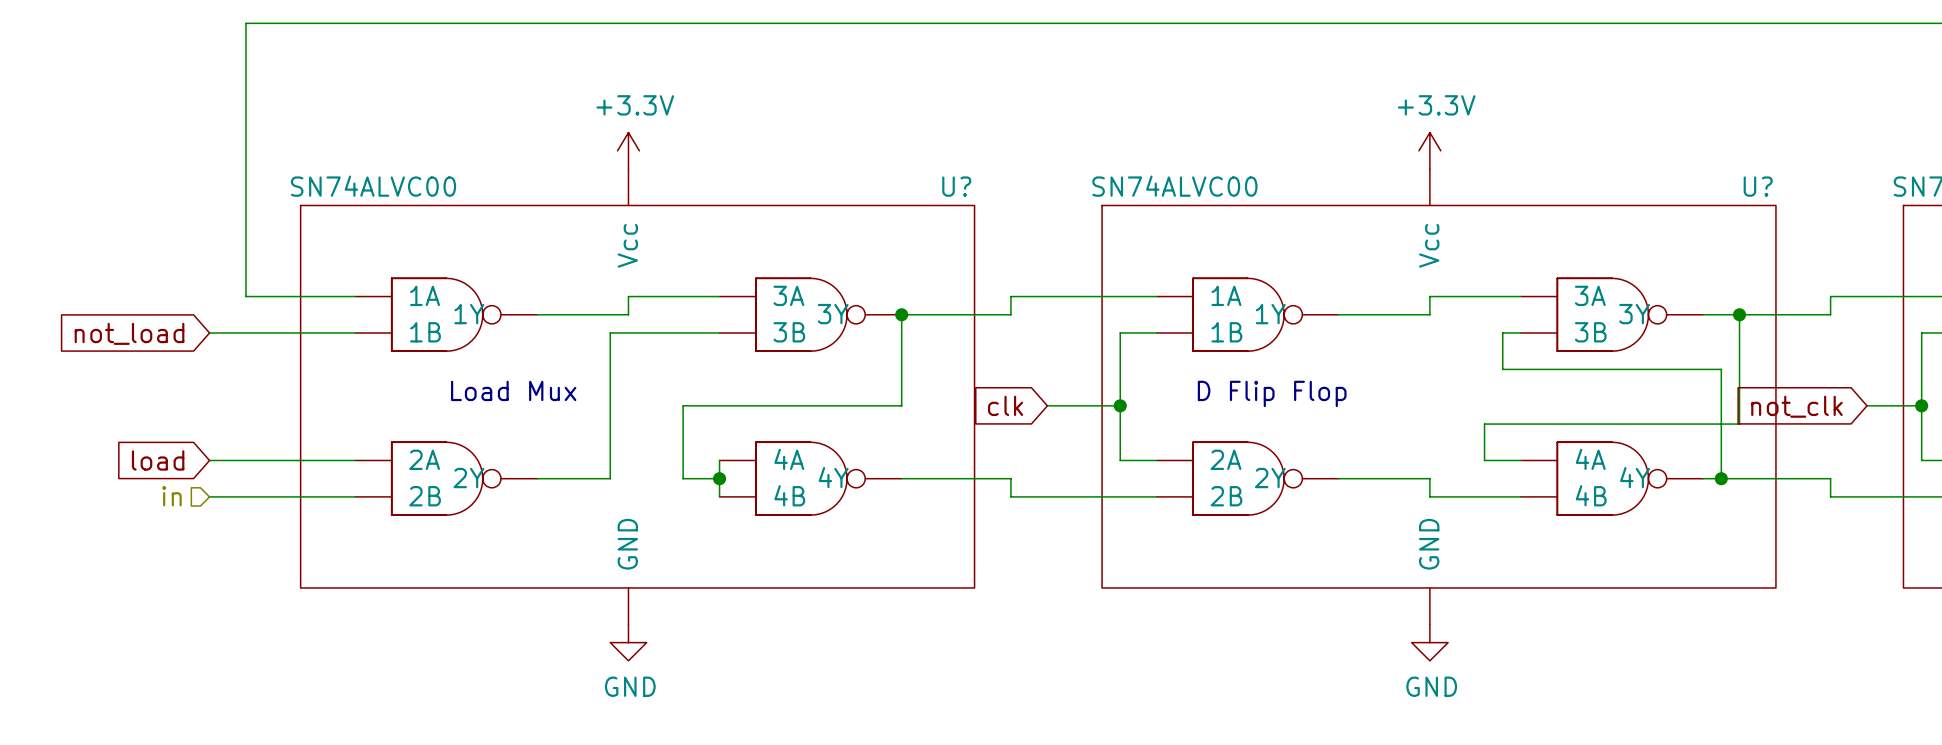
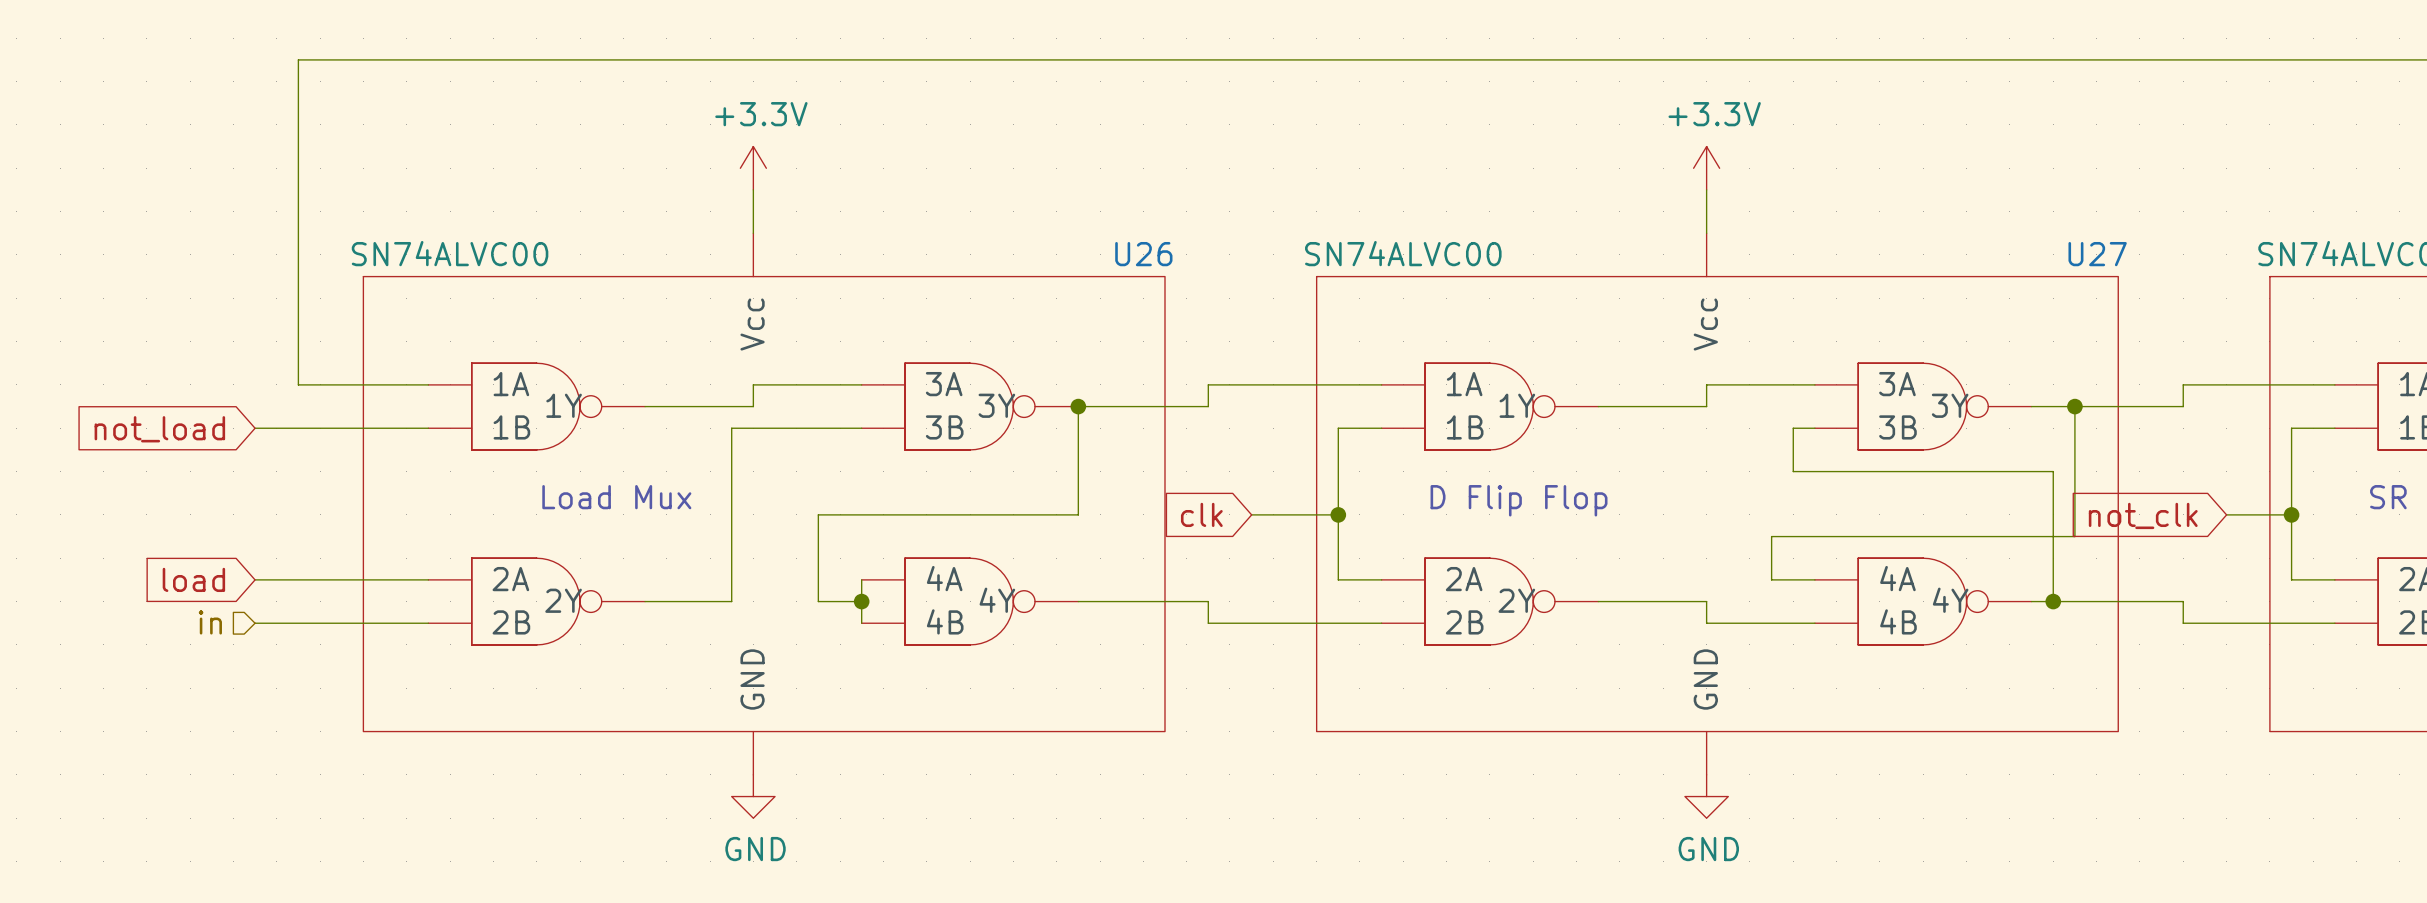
power symbol position: +3.3V (628, 150) -> +3.3V (753, 168)
power symbol position: +3.3V (1429, 150) -> +3.3V (1706, 168)
U? name: U? (956, 186) -> U26 (1143, 254)
U? name: U? (1758, 186) -> U27 (2097, 254)

